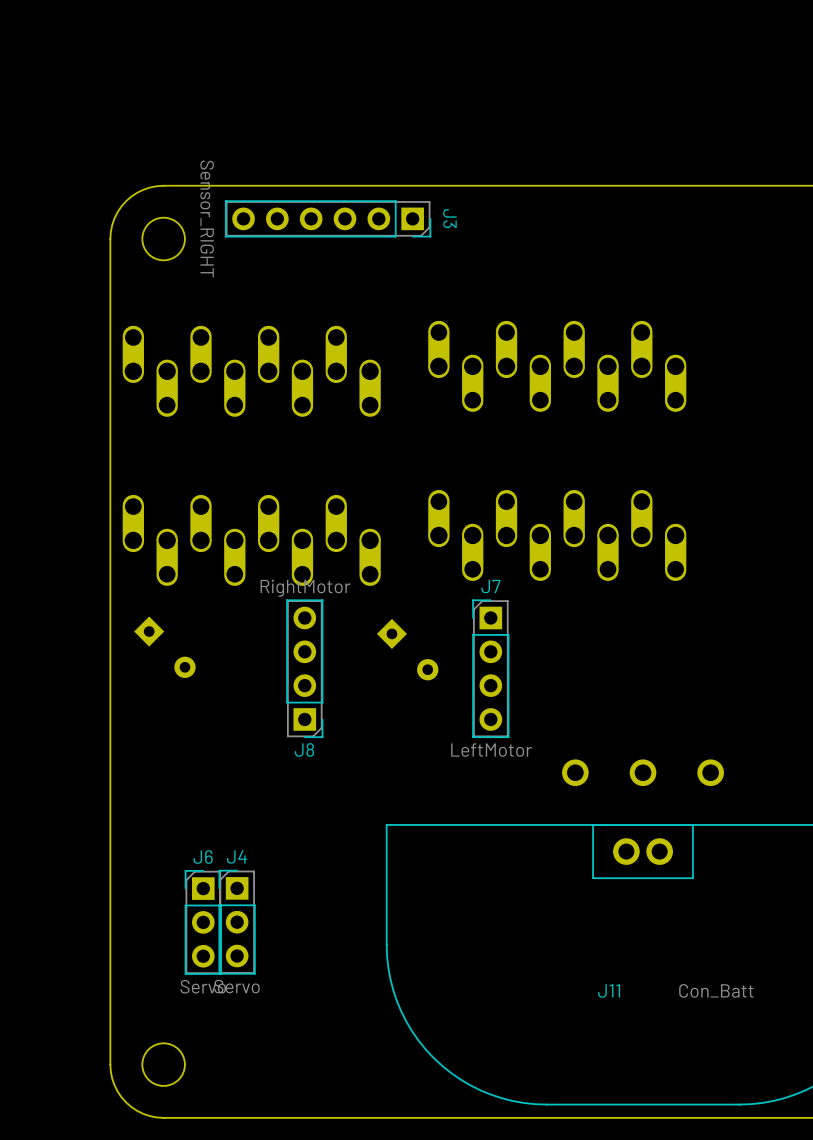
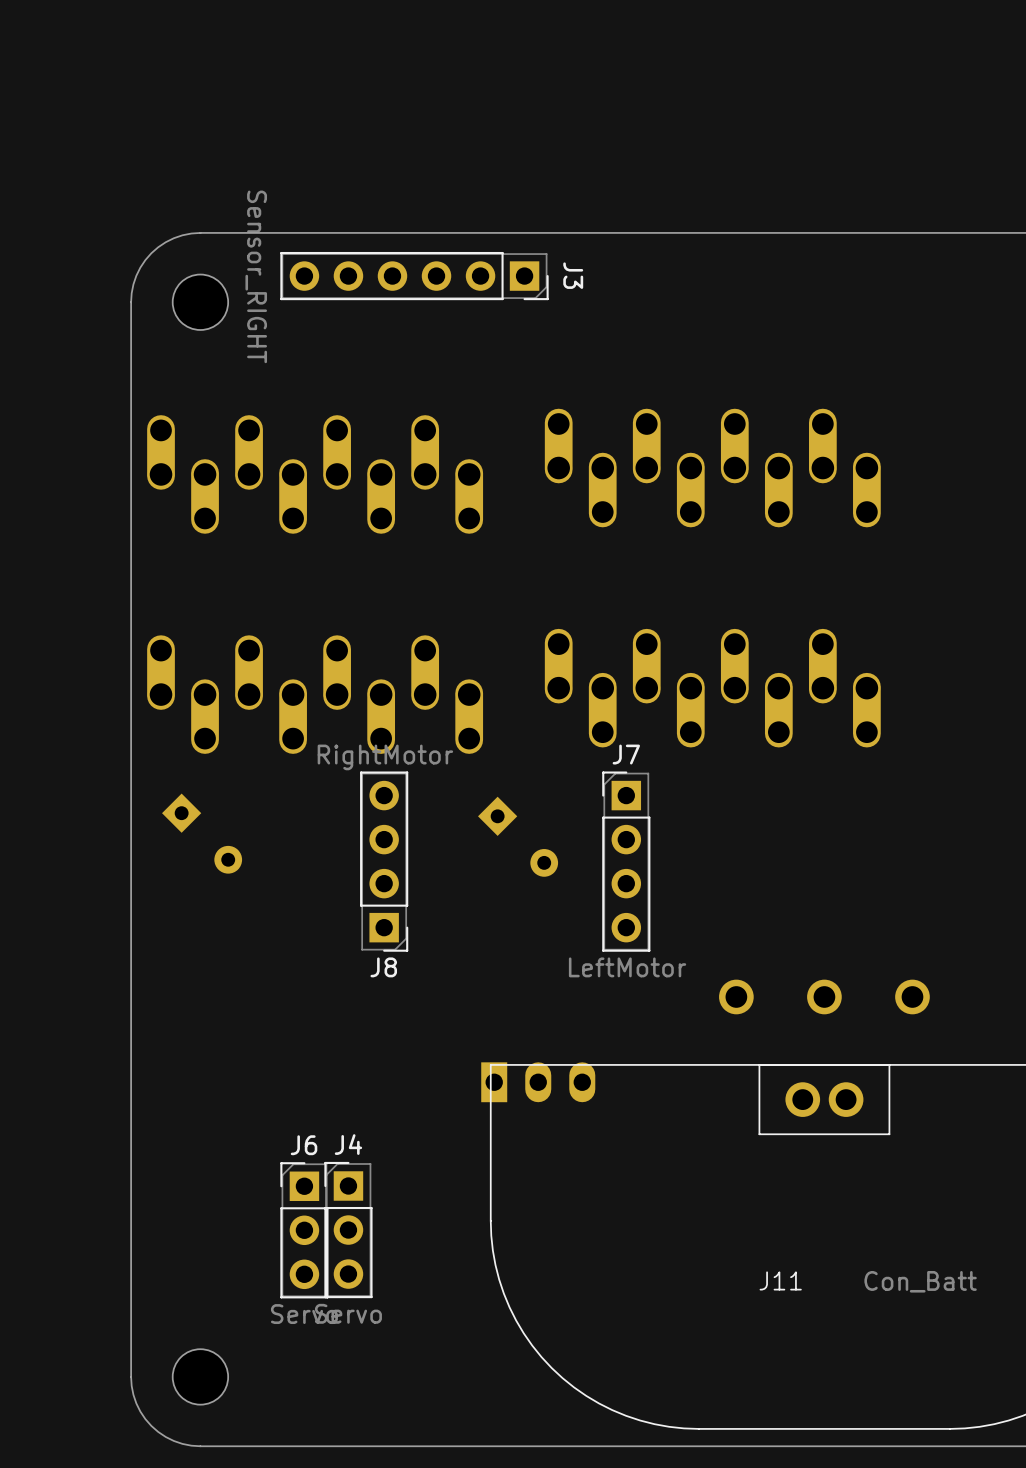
part: none -> (538, 1082)
J6 position: (203, 922) -> (304, 1230)
J4 position: (237, 922) -> (348, 1230)

